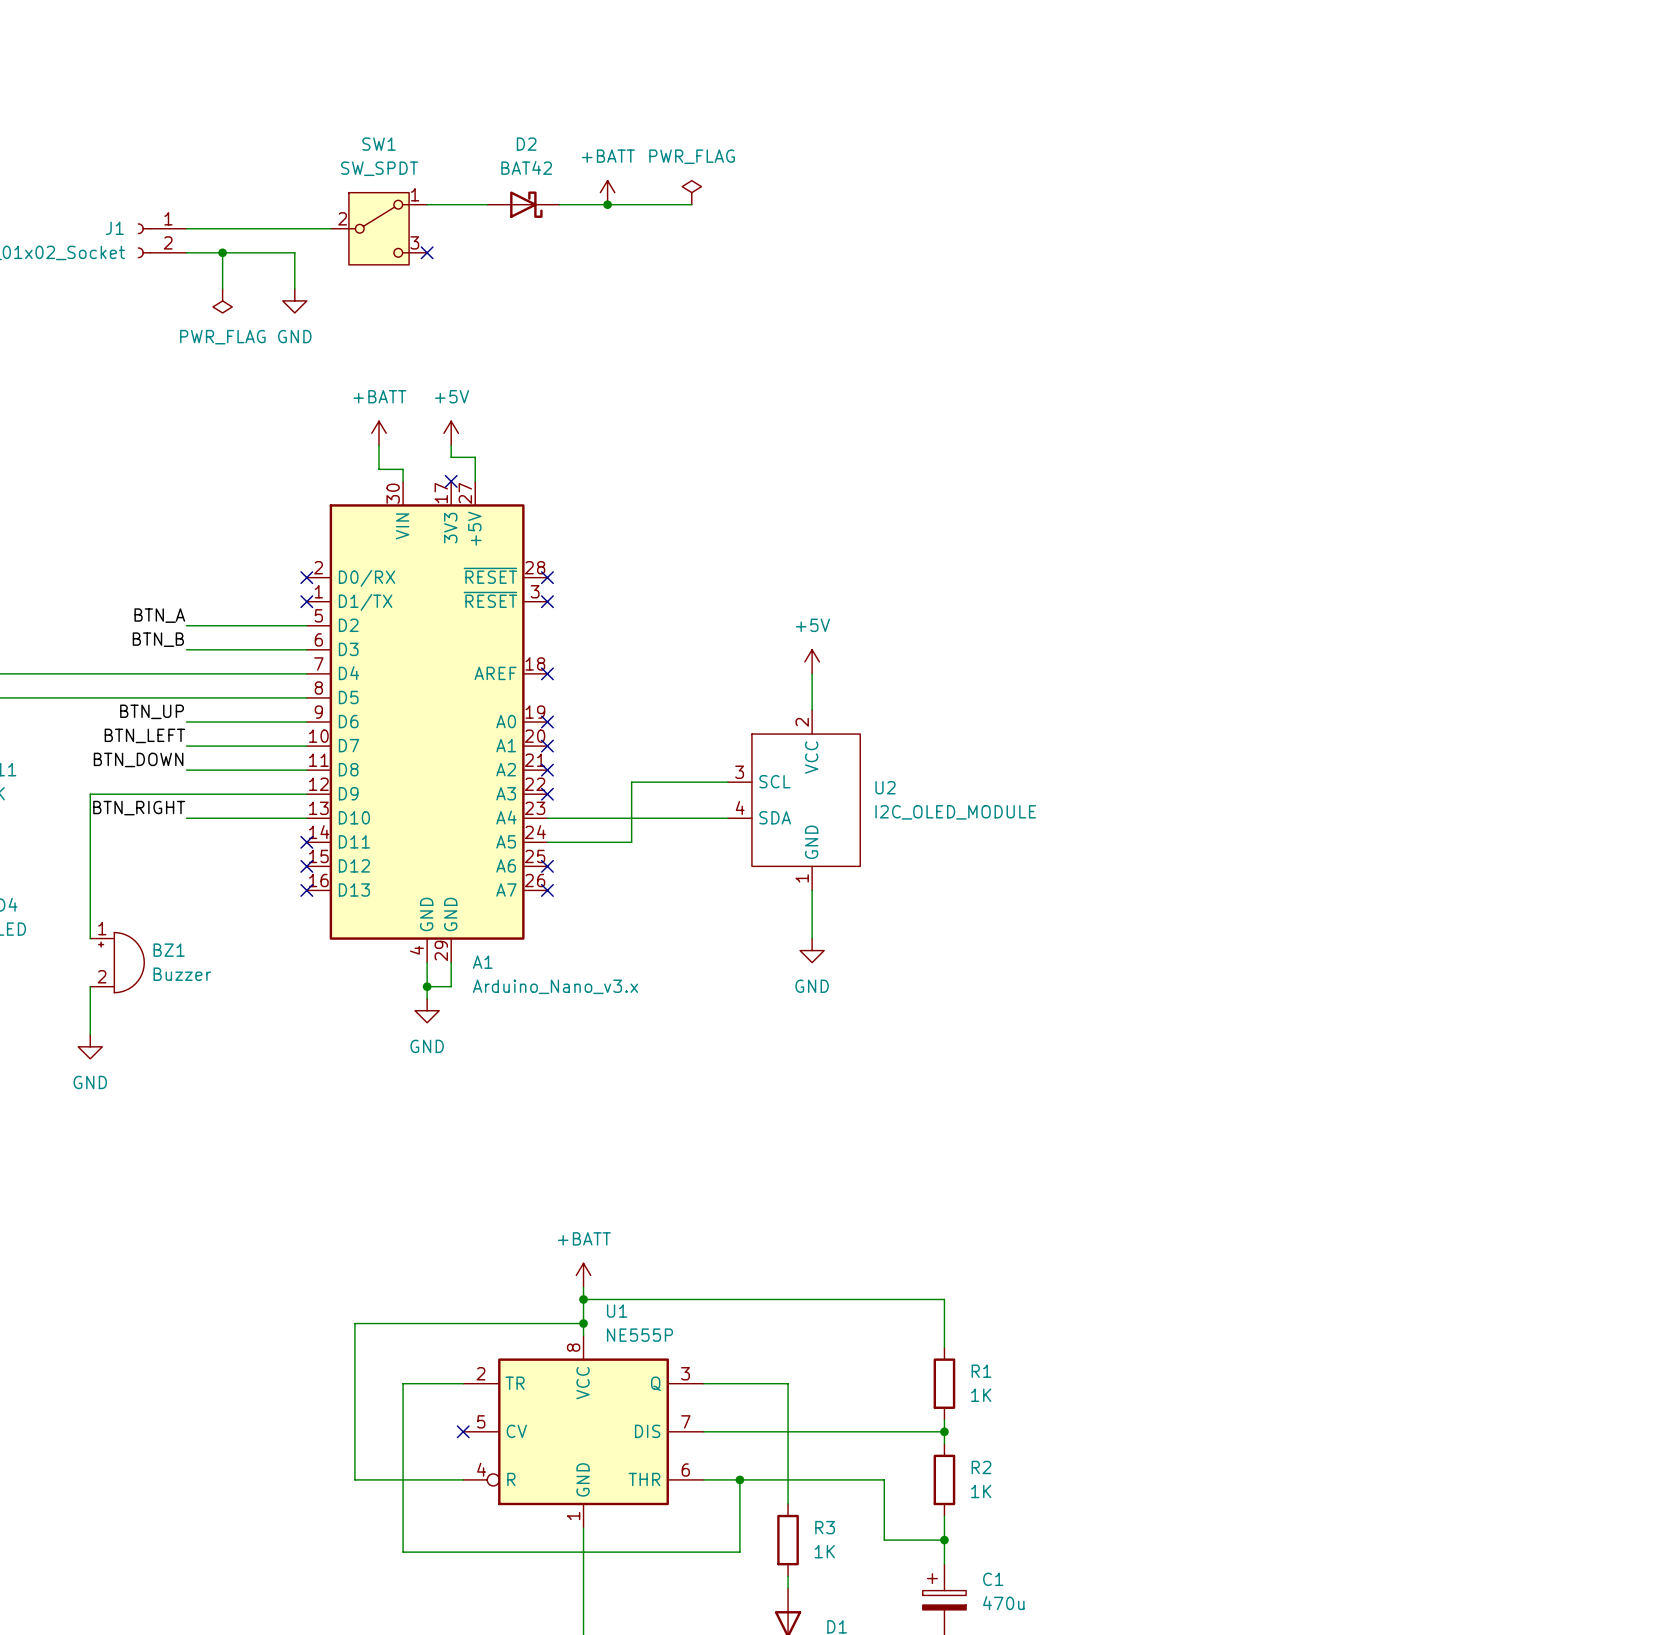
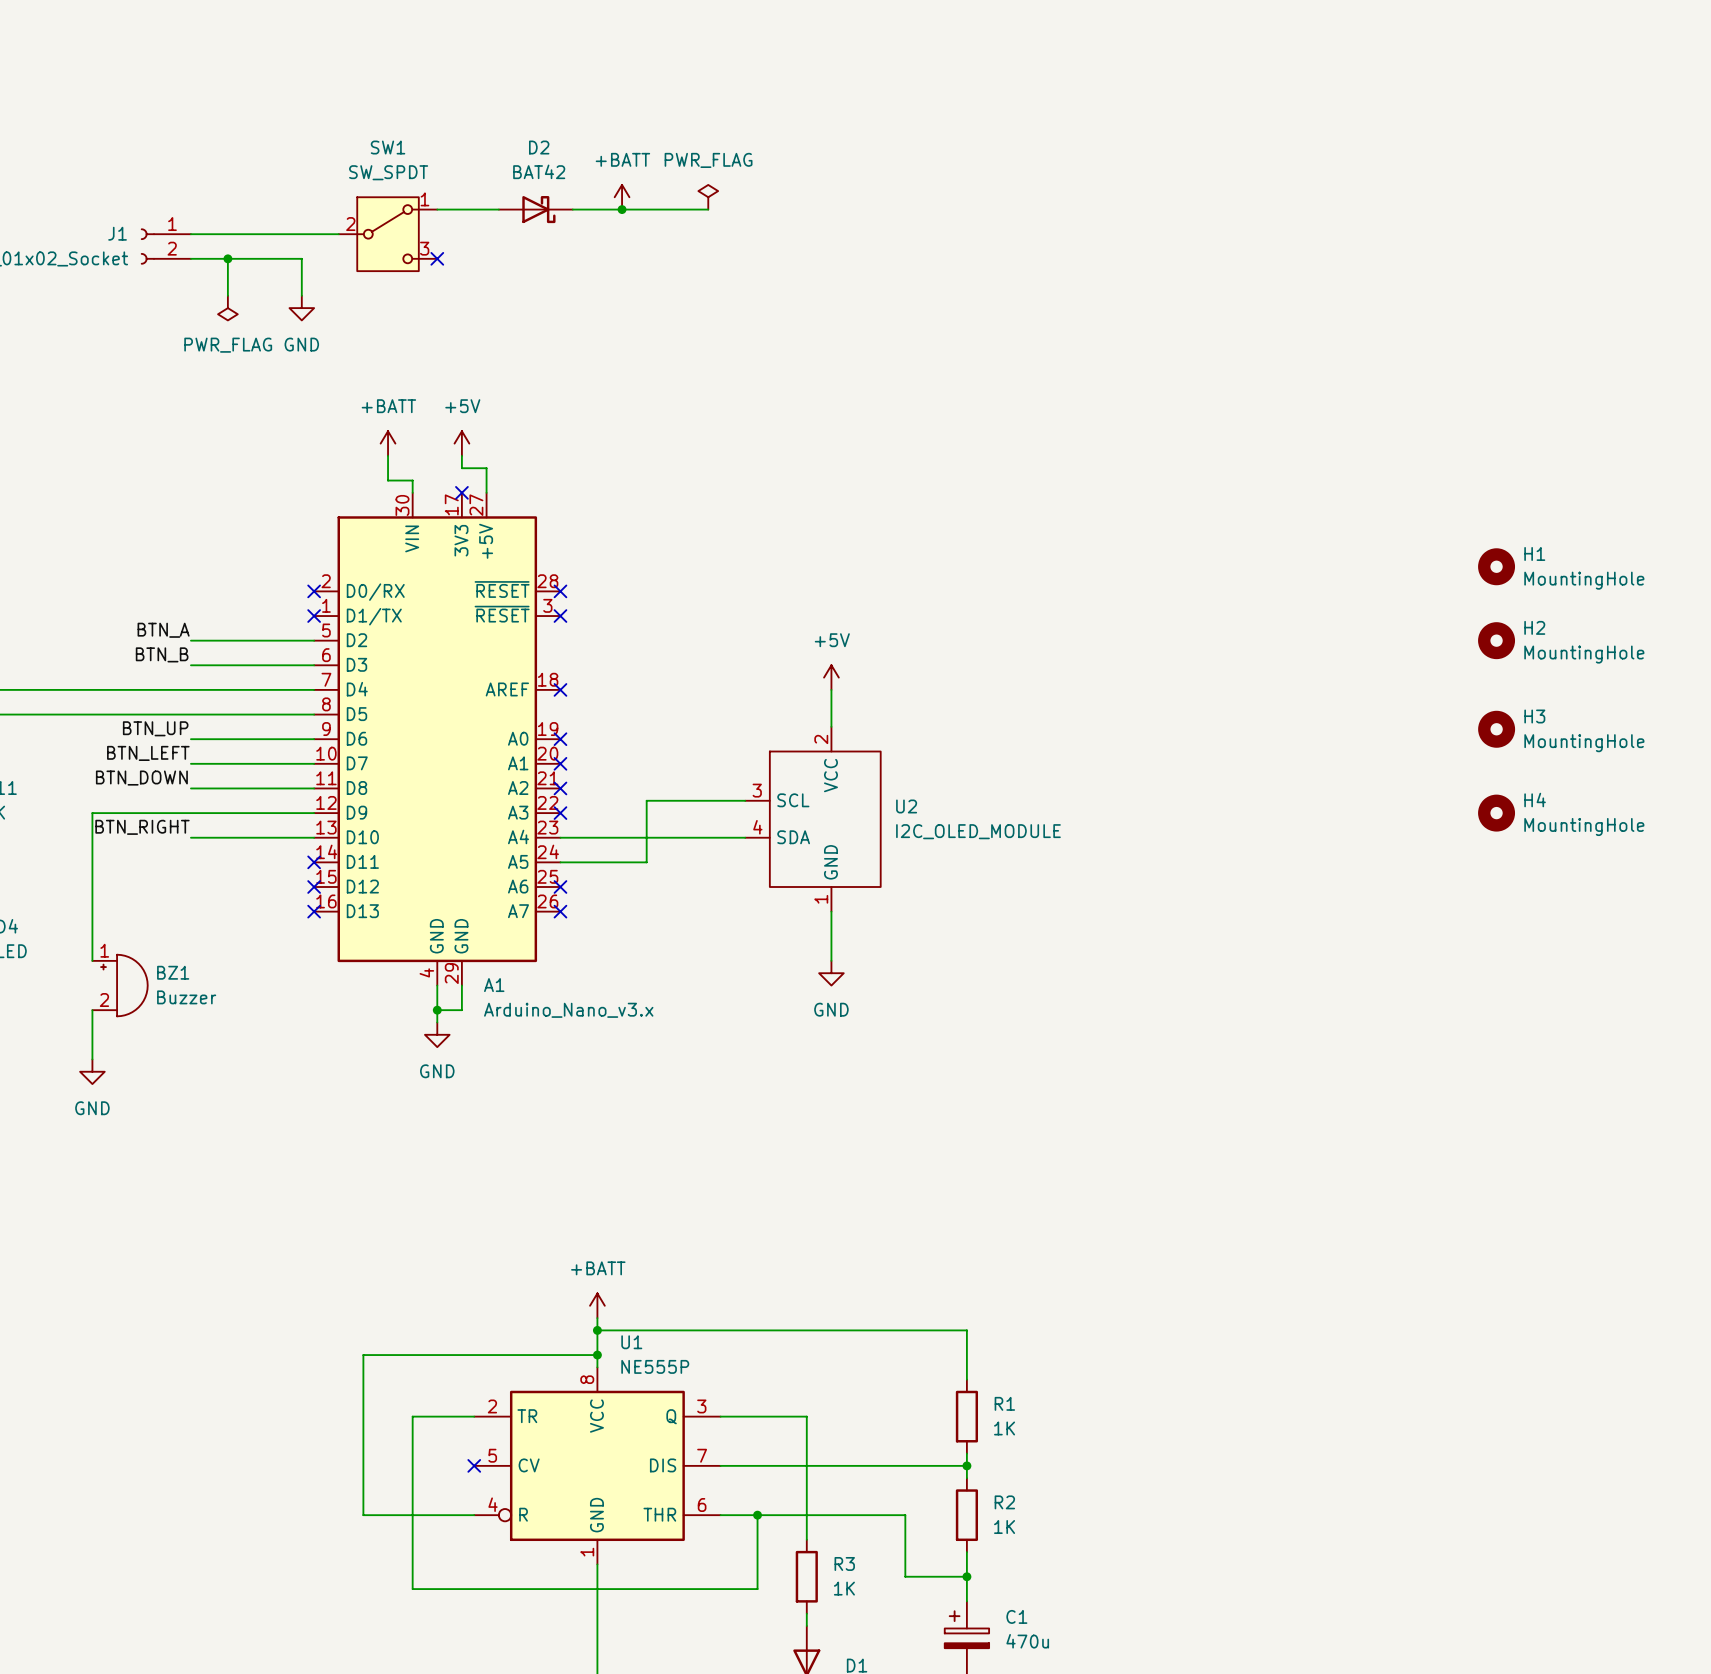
H1: none -> MountingHole (1496, 566)
H2: none -> MountingHole (1496, 640)
H3: none -> MountingHole (1496, 729)
H4: none -> MountingHole (1496, 813)

